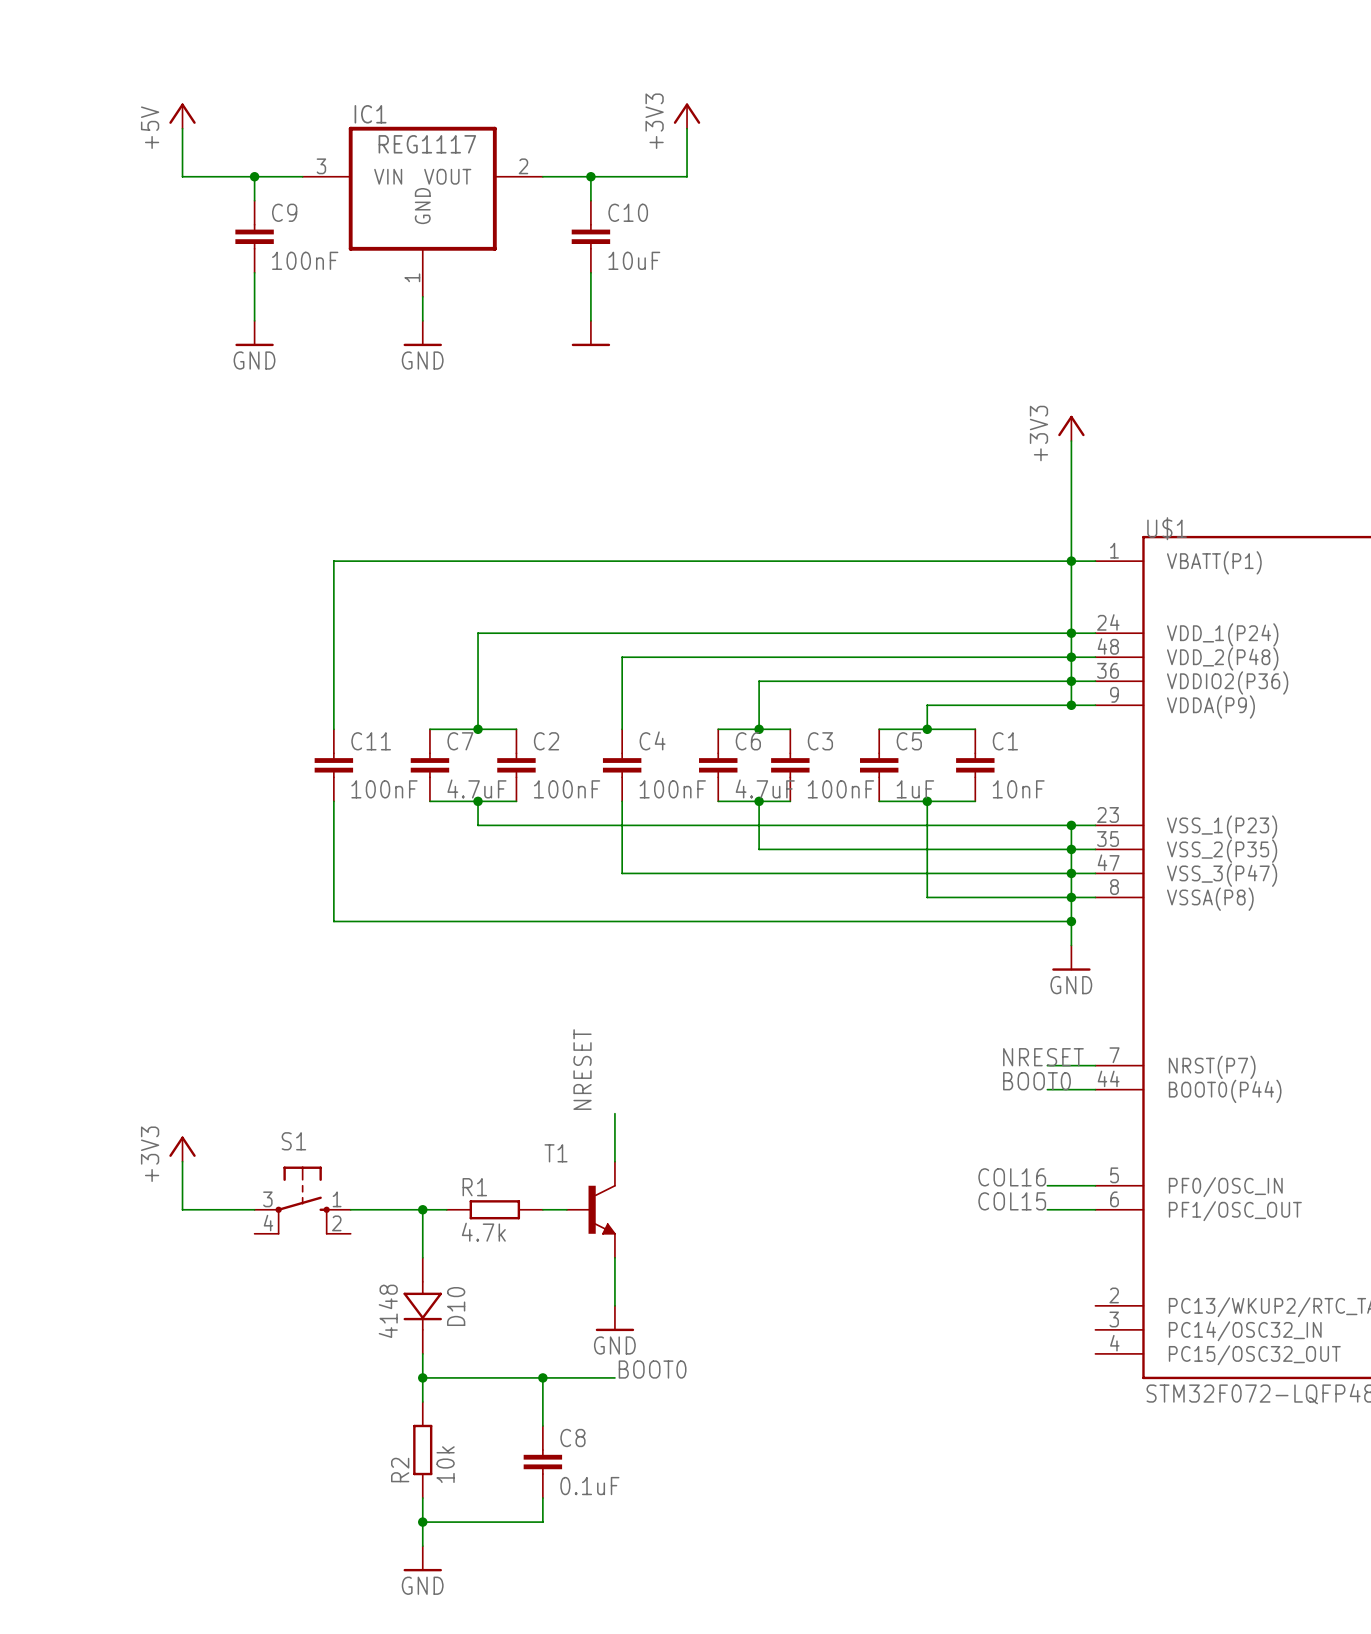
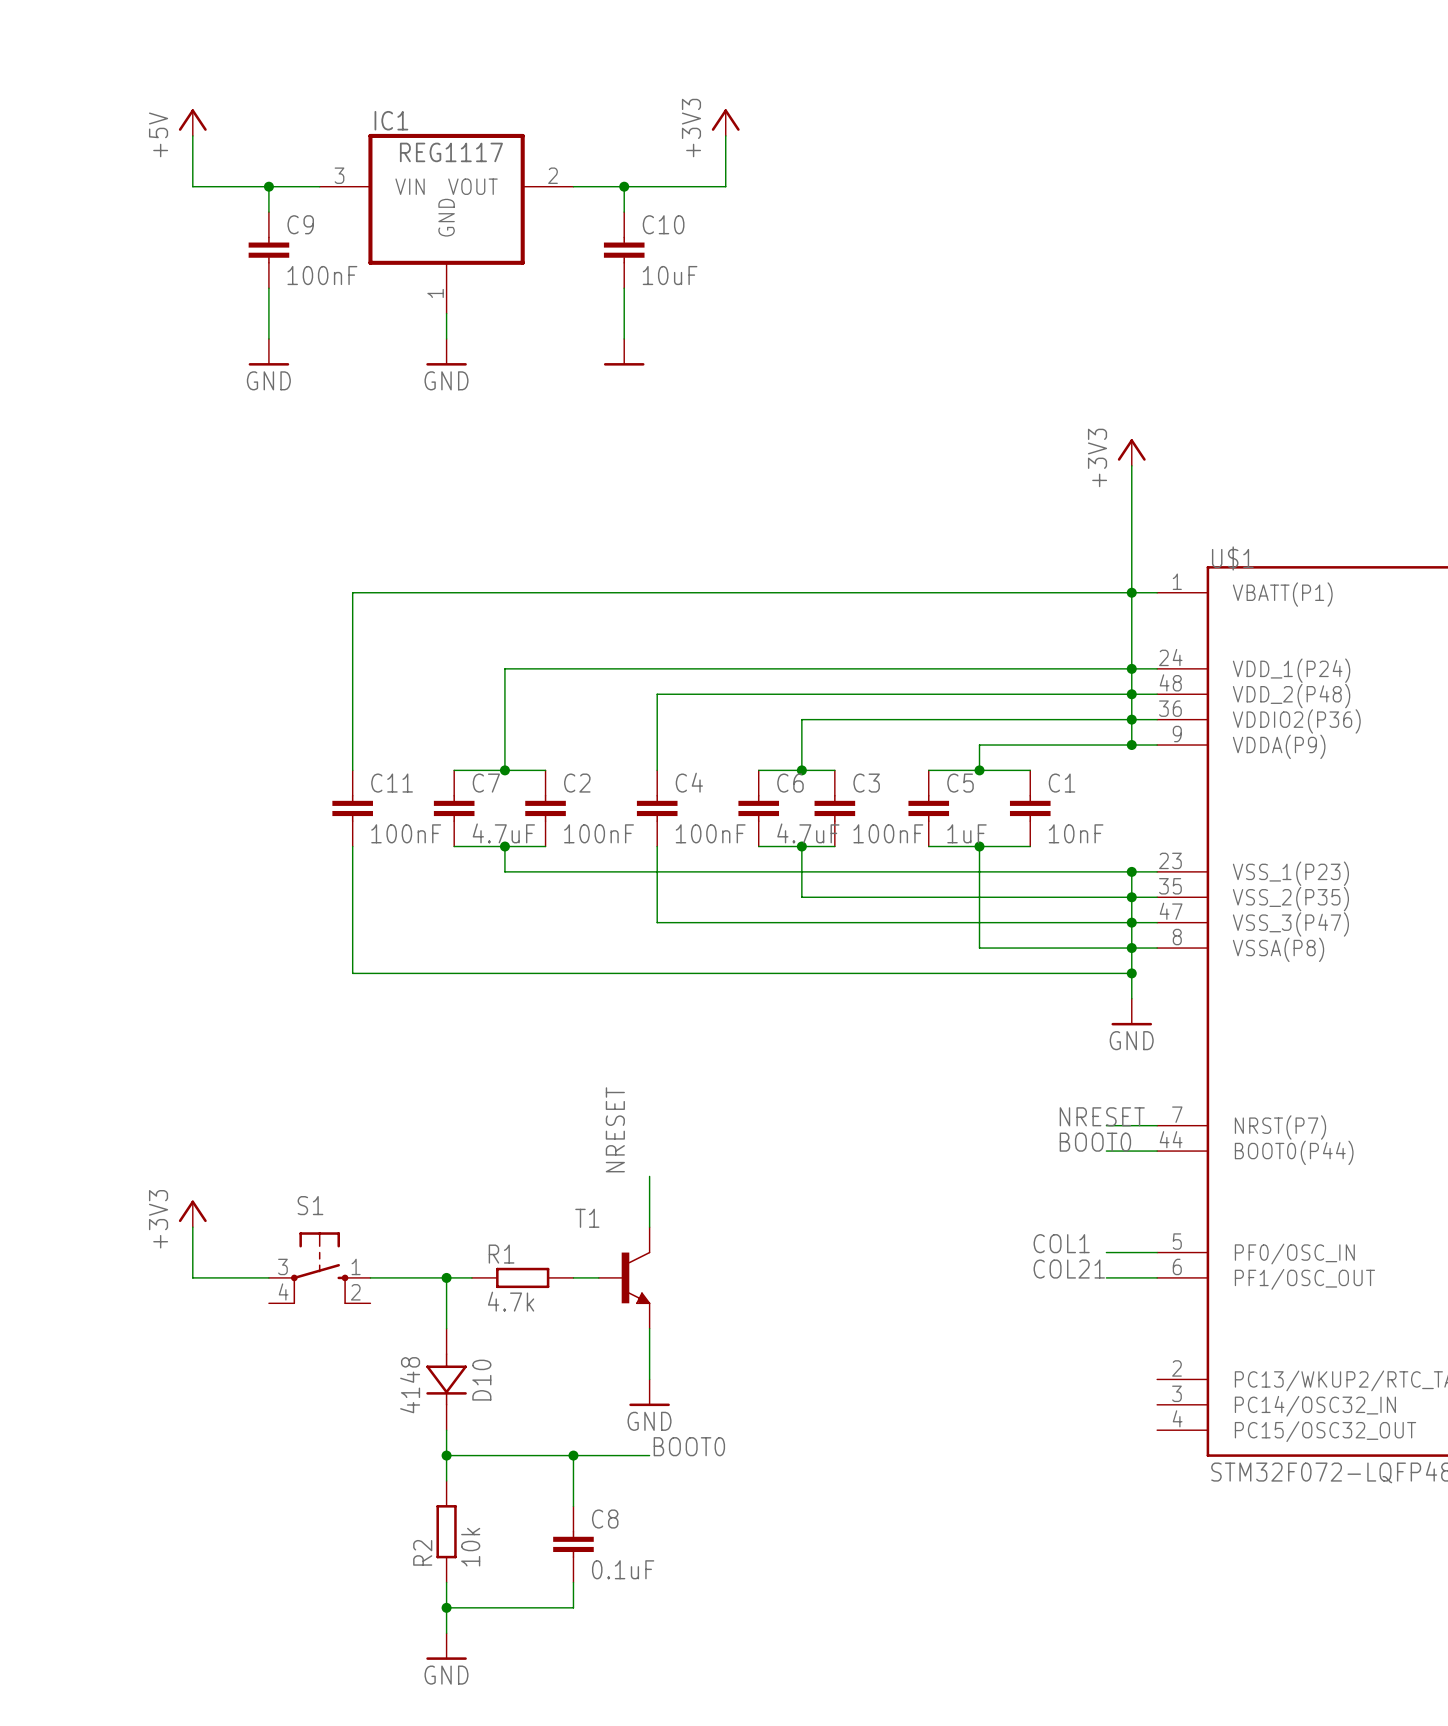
label: COL16 (1012, 1177) -> COL1 (1061, 1243)
label: COL15 (1012, 1201) -> COL21 (1069, 1269)

